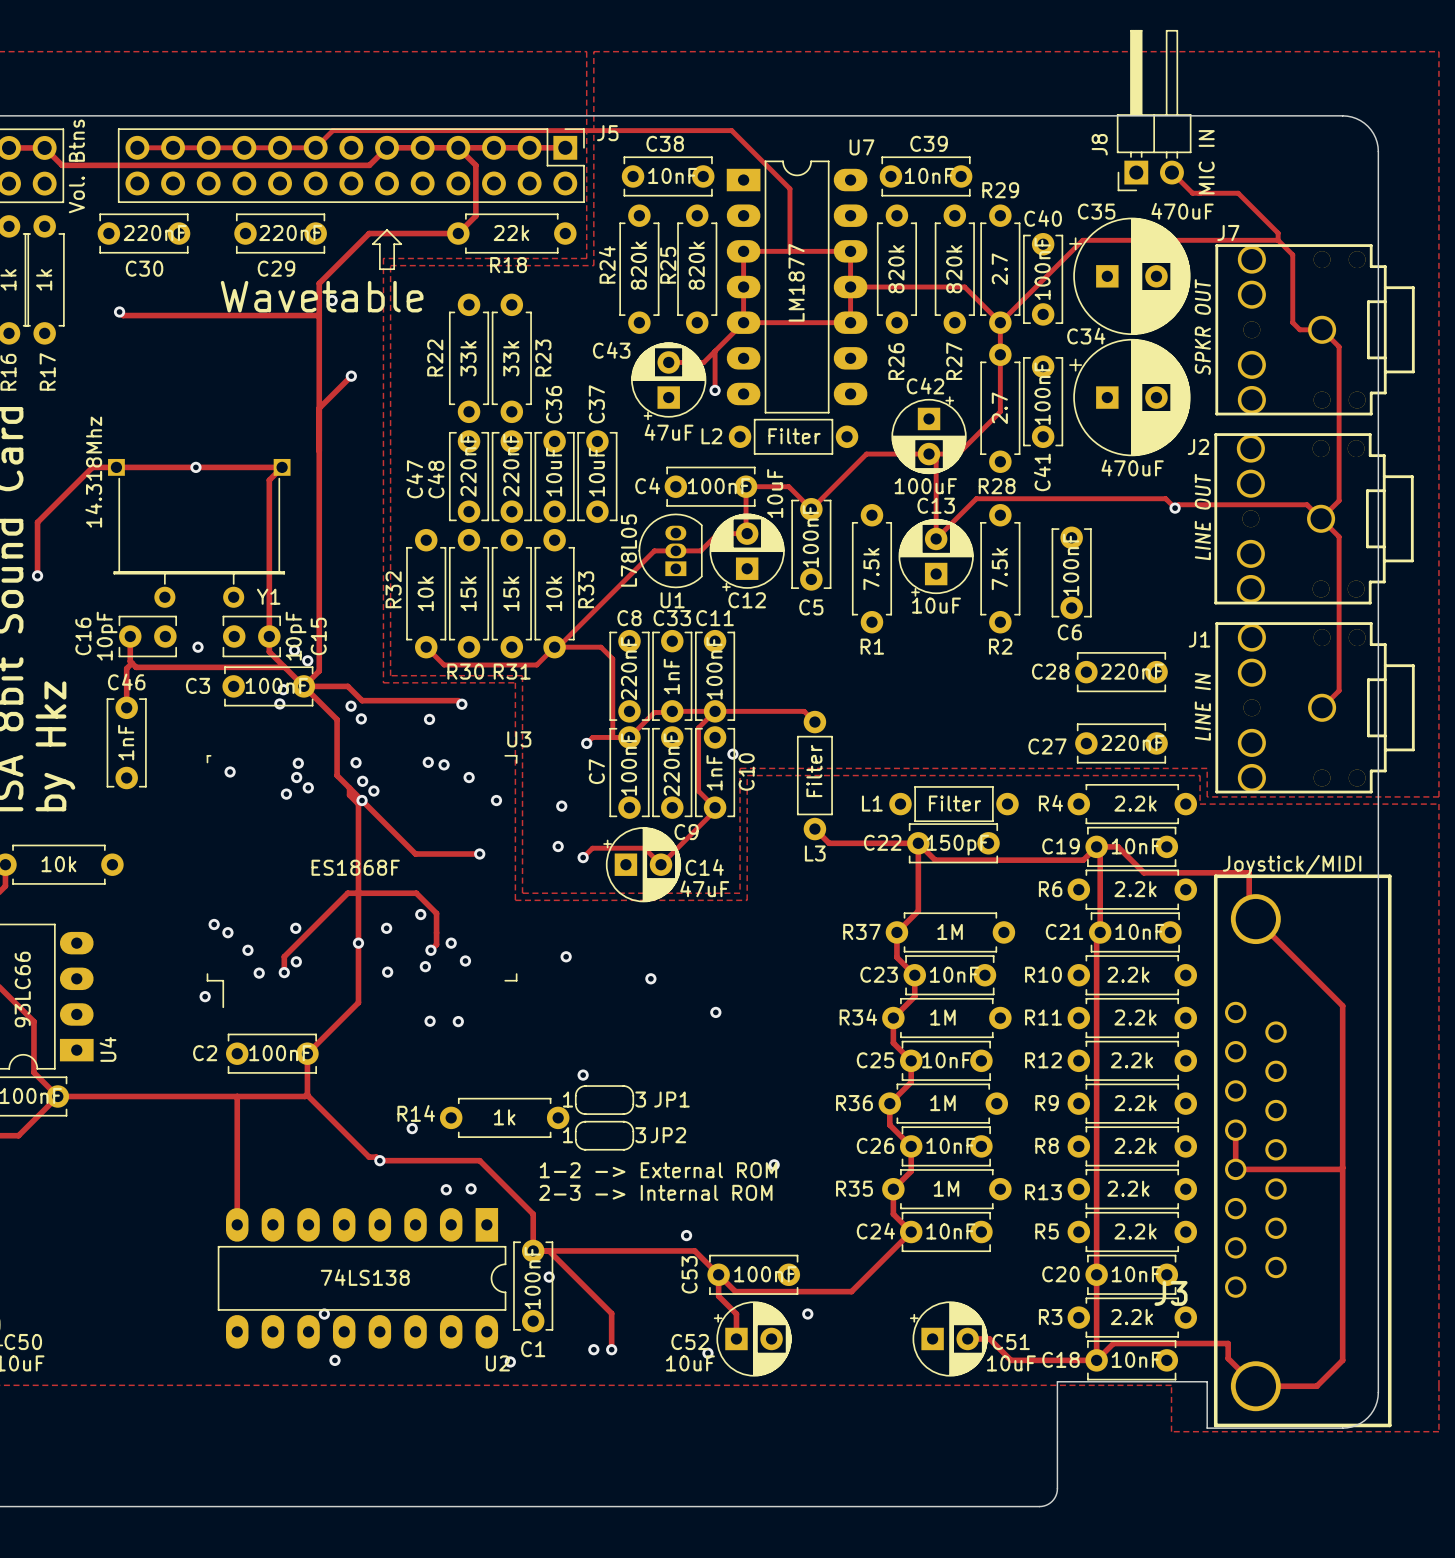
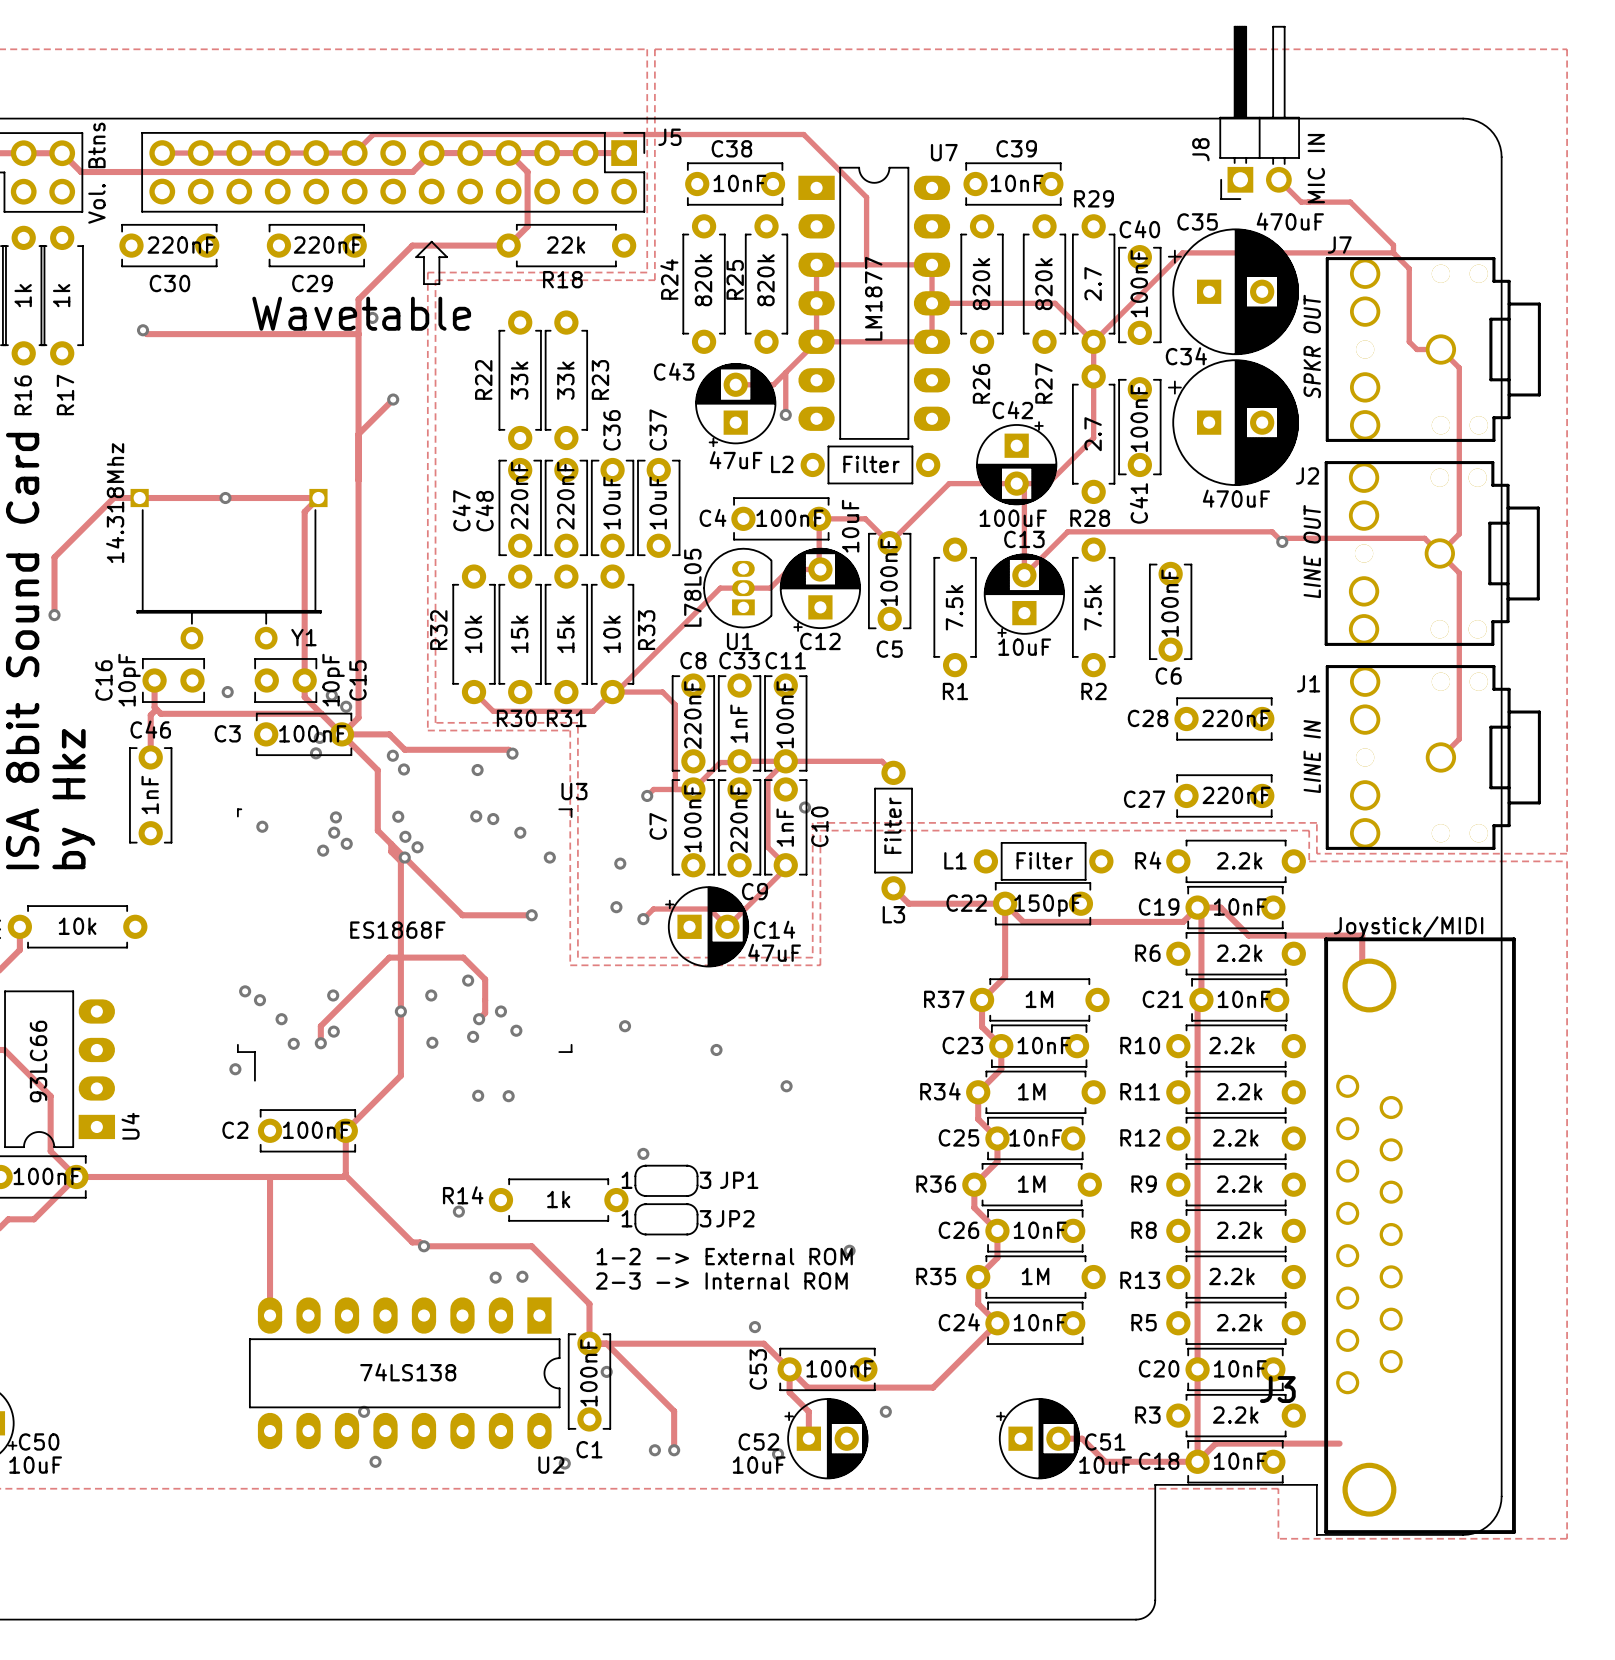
track: (1255, 919) (1342, 1005) (1342, 1360) (1316, 1386) (1255, 1386) (1228, 1358) (1228, 1343) -> none
track: (1235, 1130) (1235, 1169) (1341, 1169) (1342, 1167) -> none

